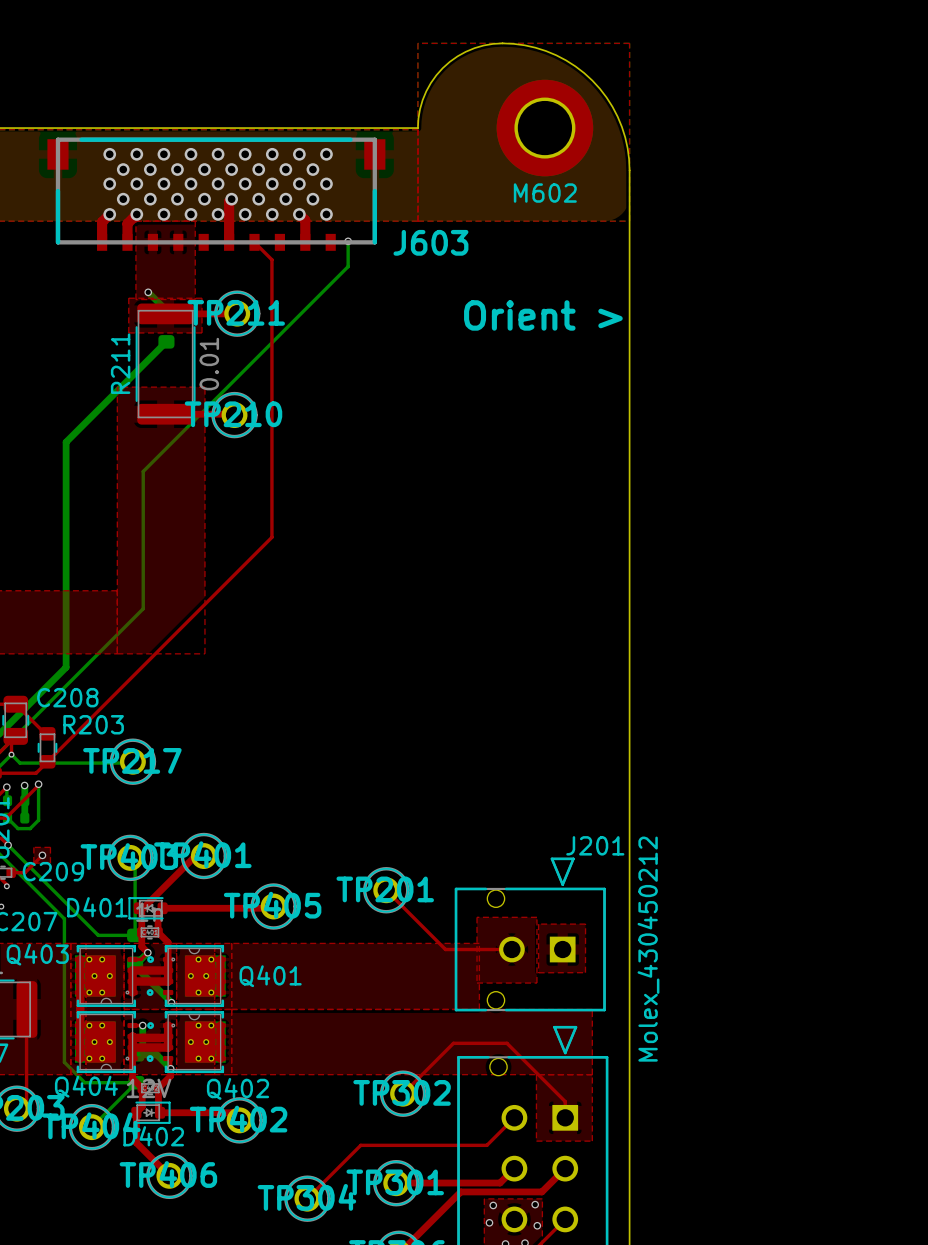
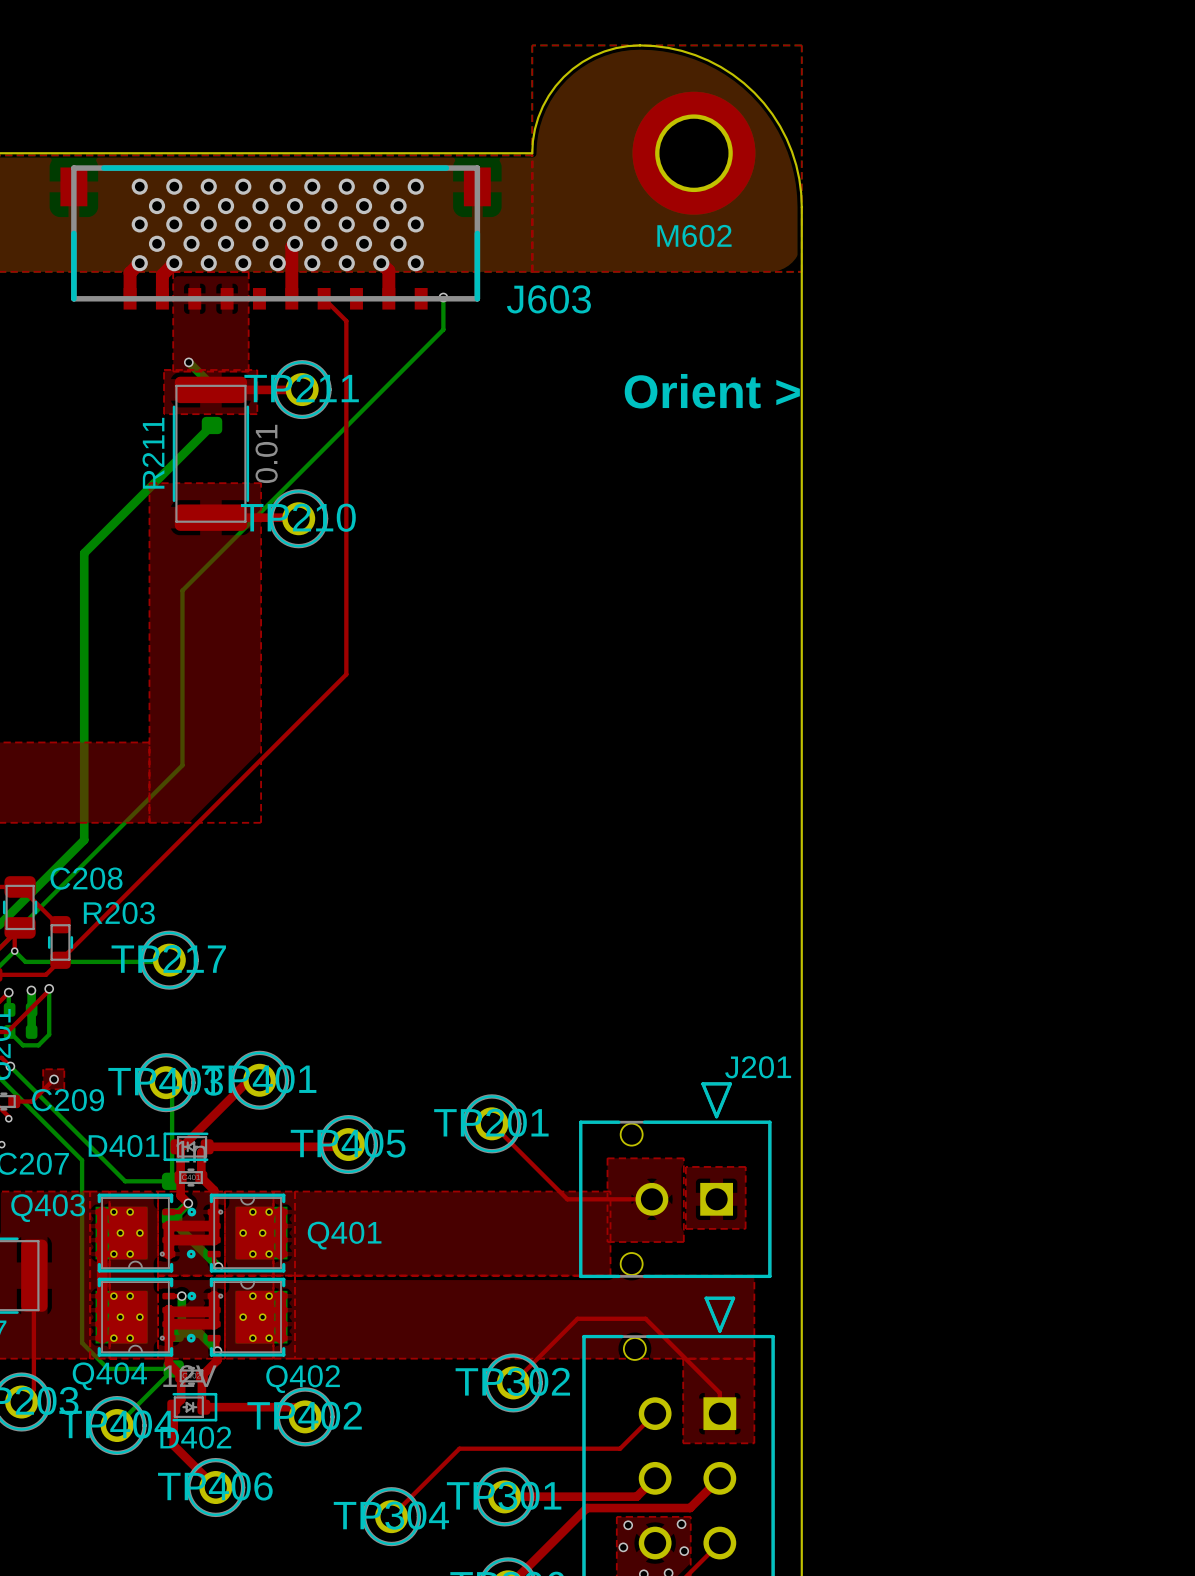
J201 text: Molex_430450212 (648, 949) -> none

